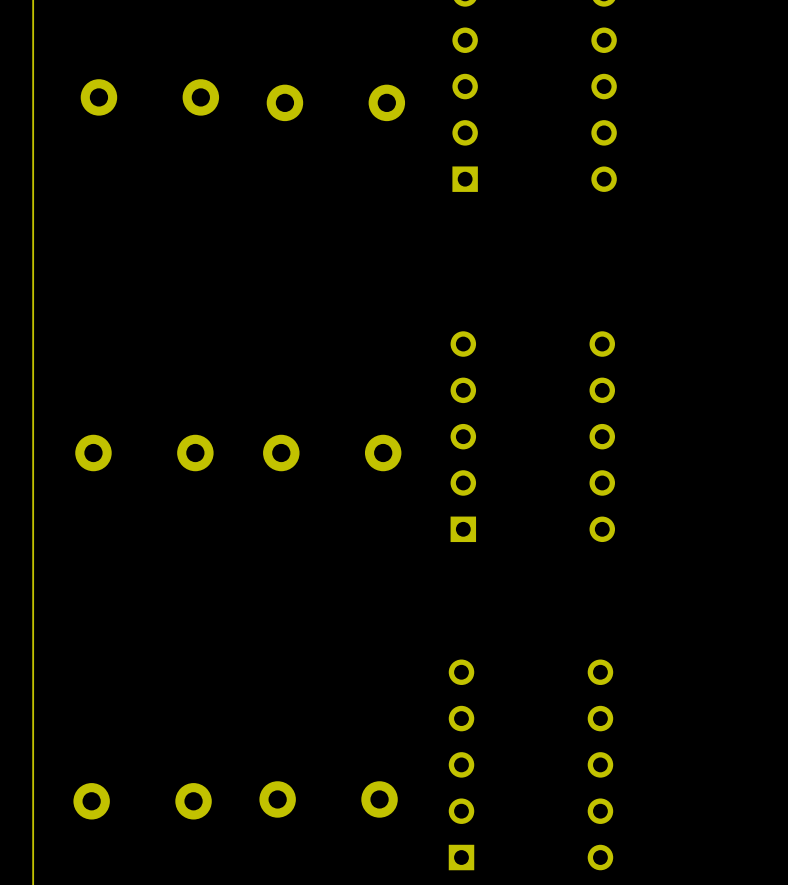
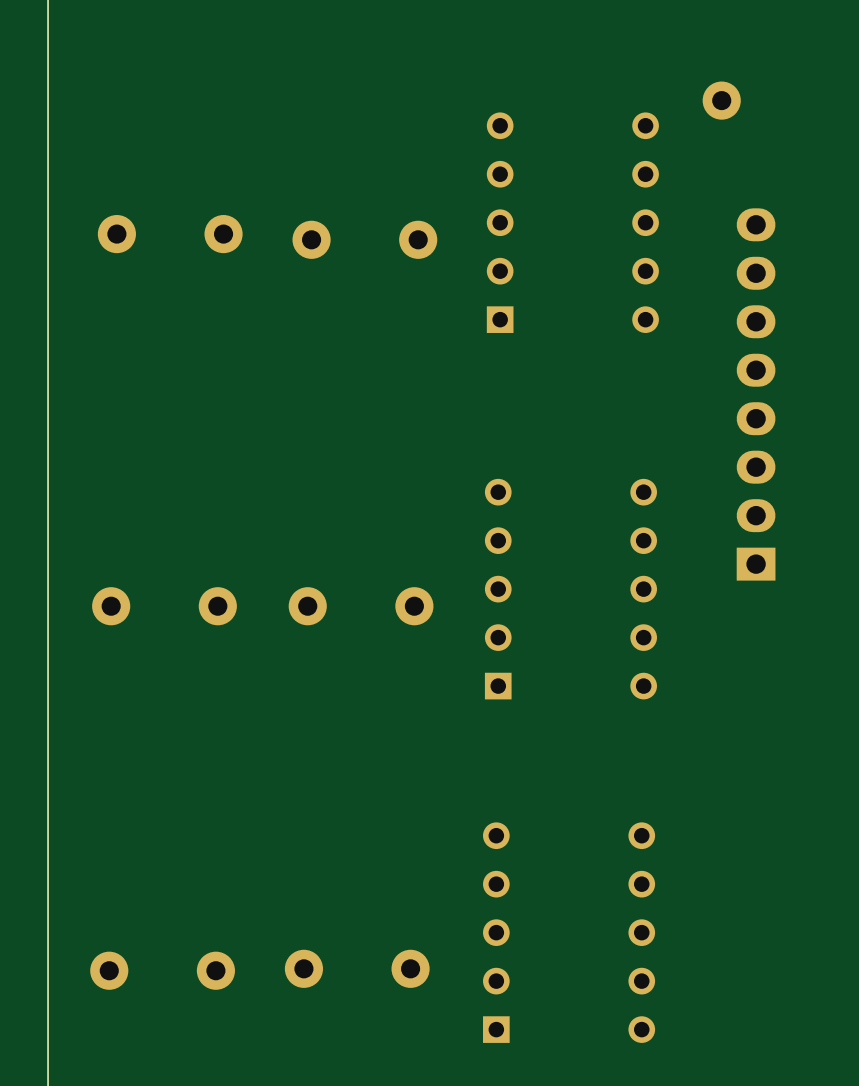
part: none -> (756, 394)

